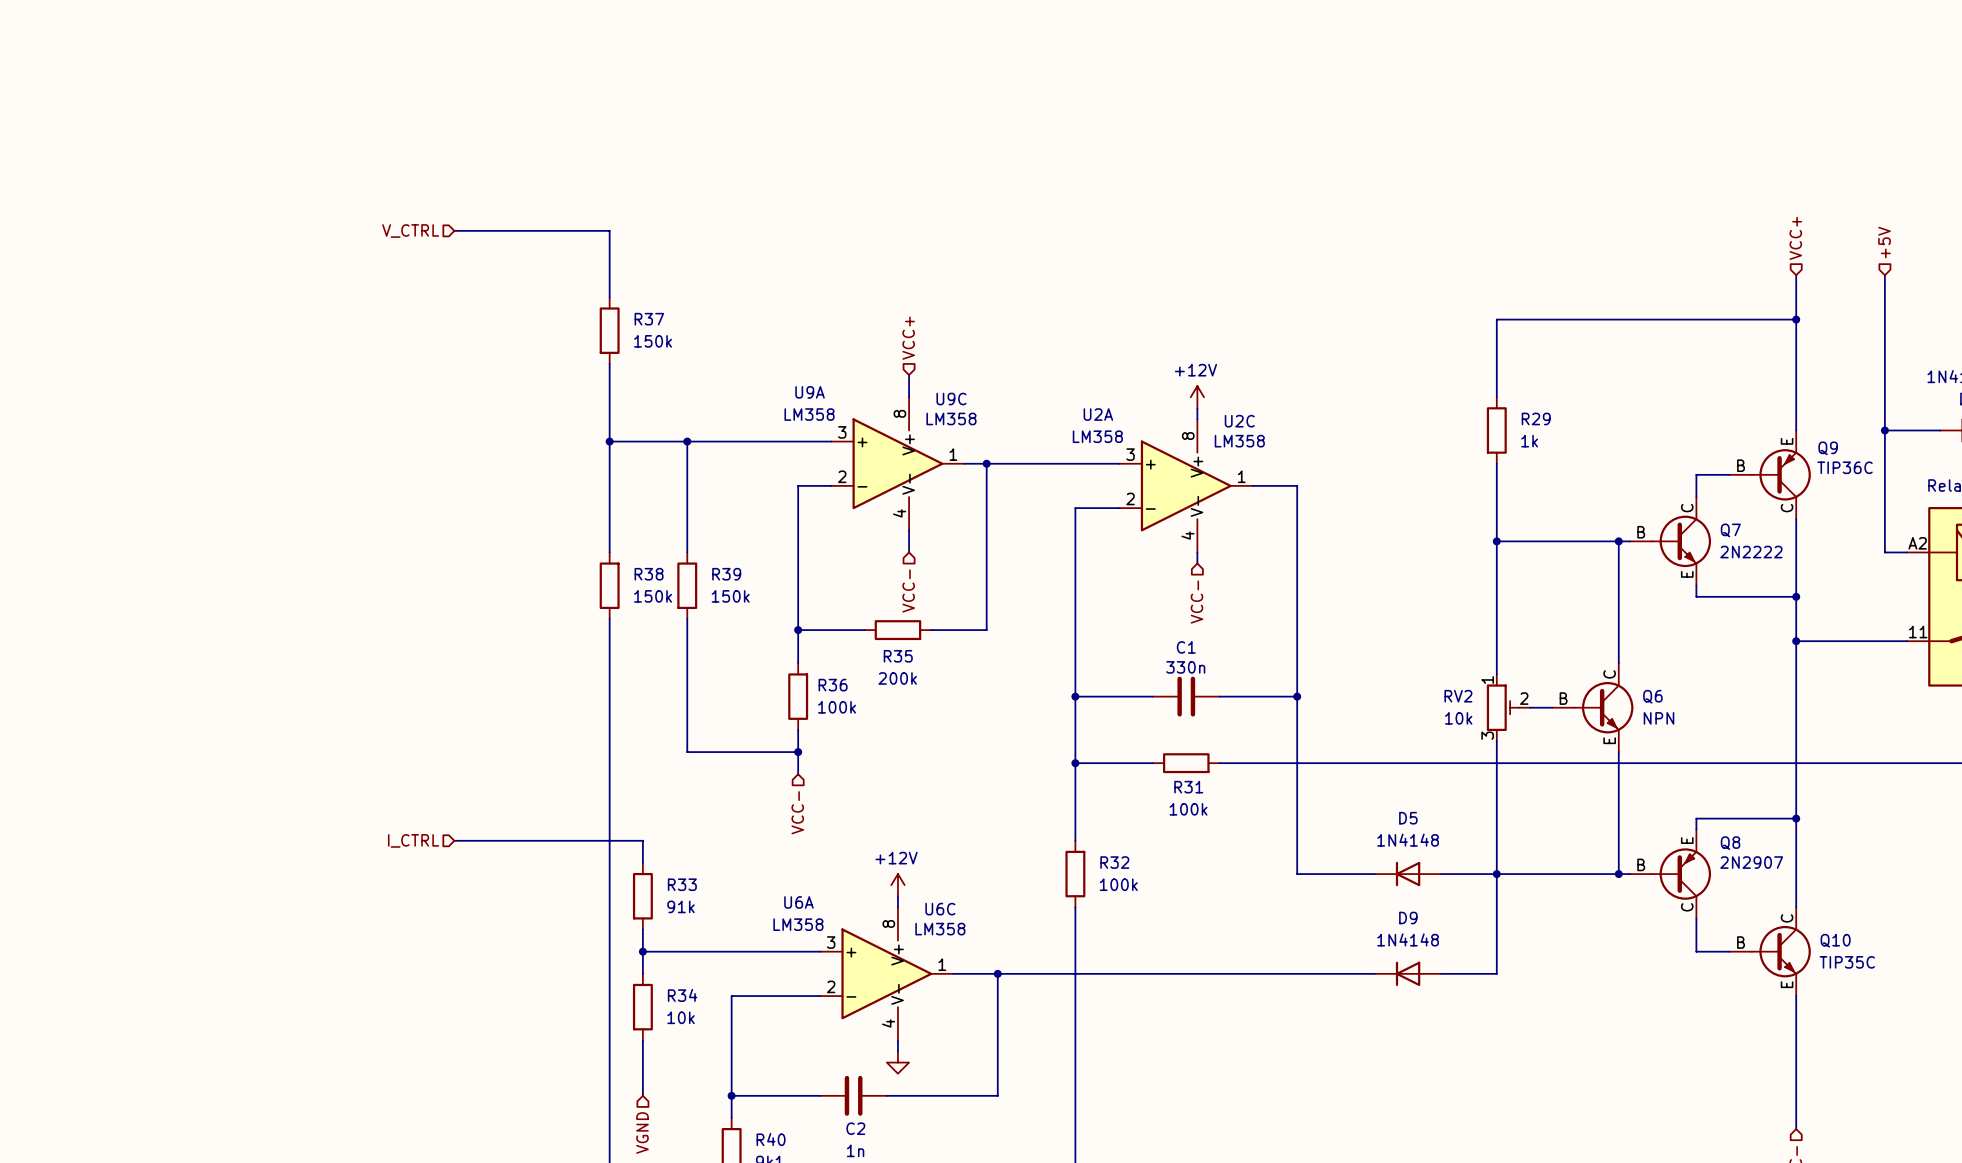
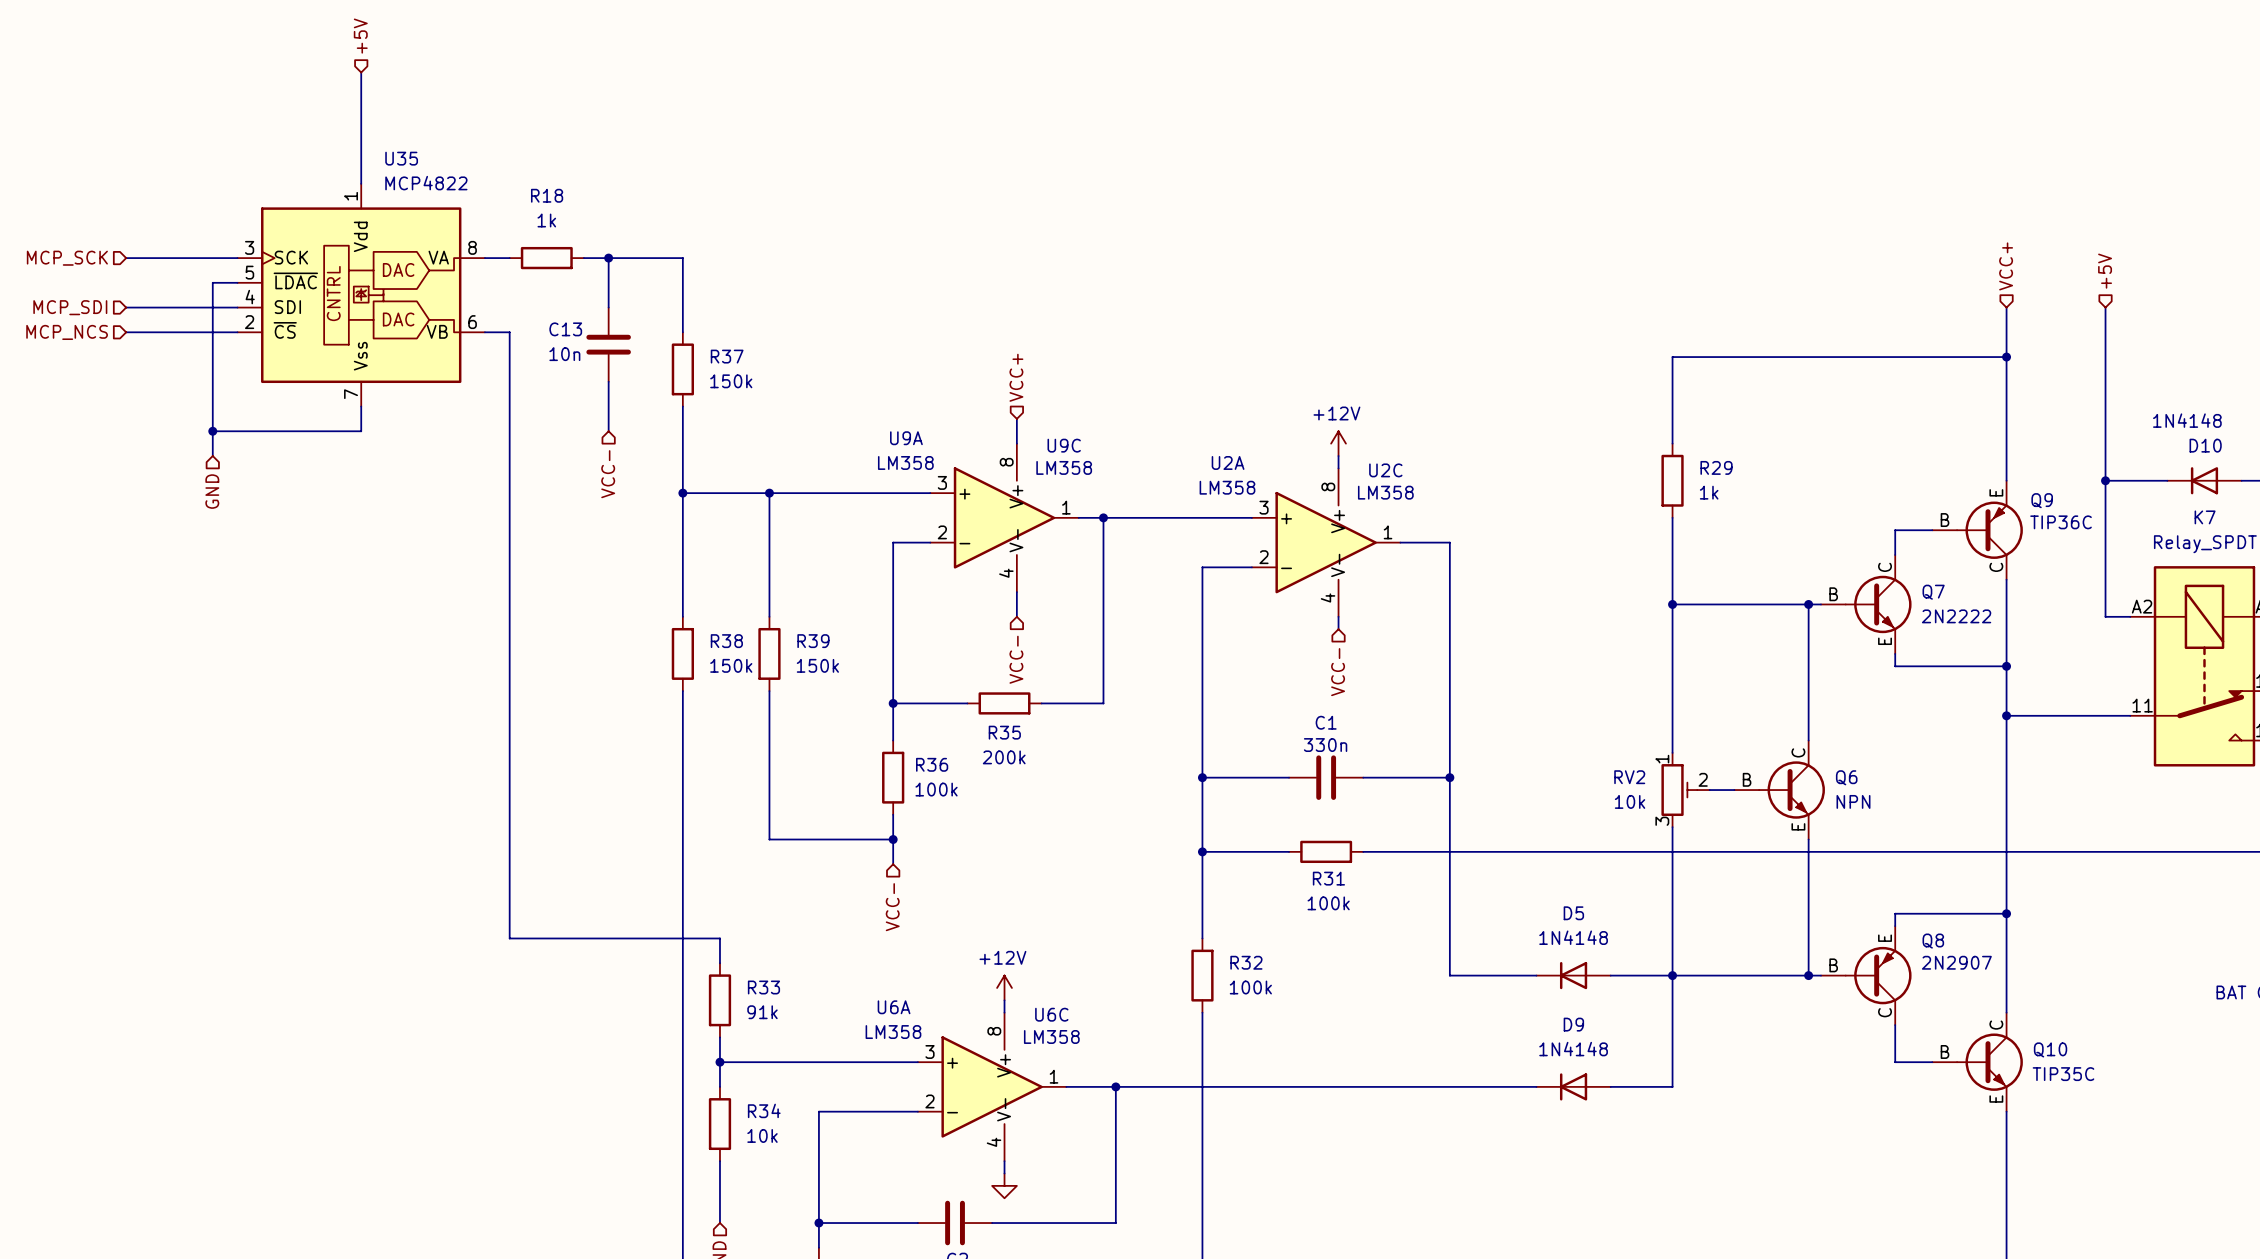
hierarchical label: none -> +5V (360, 36)
wire: none -> (361, 72) (361, 183)
hierarchical label: none -> MCP_SCK (67, 258)
wire: none -> (126, 258) (237, 258)
hierarchical label: V_CTRL (410, 230) -> none
wire: (454, 230) (520, 230) -> (509, 258) (484, 258)
R18: none -> 1k (546, 258)
wire: none -> (608, 258) (608, 307)
junction: none -> (608, 258)
wire: none -> (237, 282) (212, 282) (212, 456)
U35: none -> MCP4822 (361, 295)
hierarchical label: none -> MCP_SDI (70, 307)
wire: none -> (126, 307) (237, 307)
hierarchical label: none -> MCP_NCS (67, 332)
wire: none -> (126, 332) (237, 332)
wire: none -> (484, 332) (509, 332) (509, 938)
C13: none -> 10n (608, 344)
wire: none -> (608, 381) (608, 431)
wire: none -> (361, 406) (361, 431) (212, 431)
junction: none -> (212, 431)
hierarchical label: none -> VCC- (608, 474)
hierarchical label: none -> GND (212, 491)
hierarchical label: I_CTRL (413, 840) -> none

